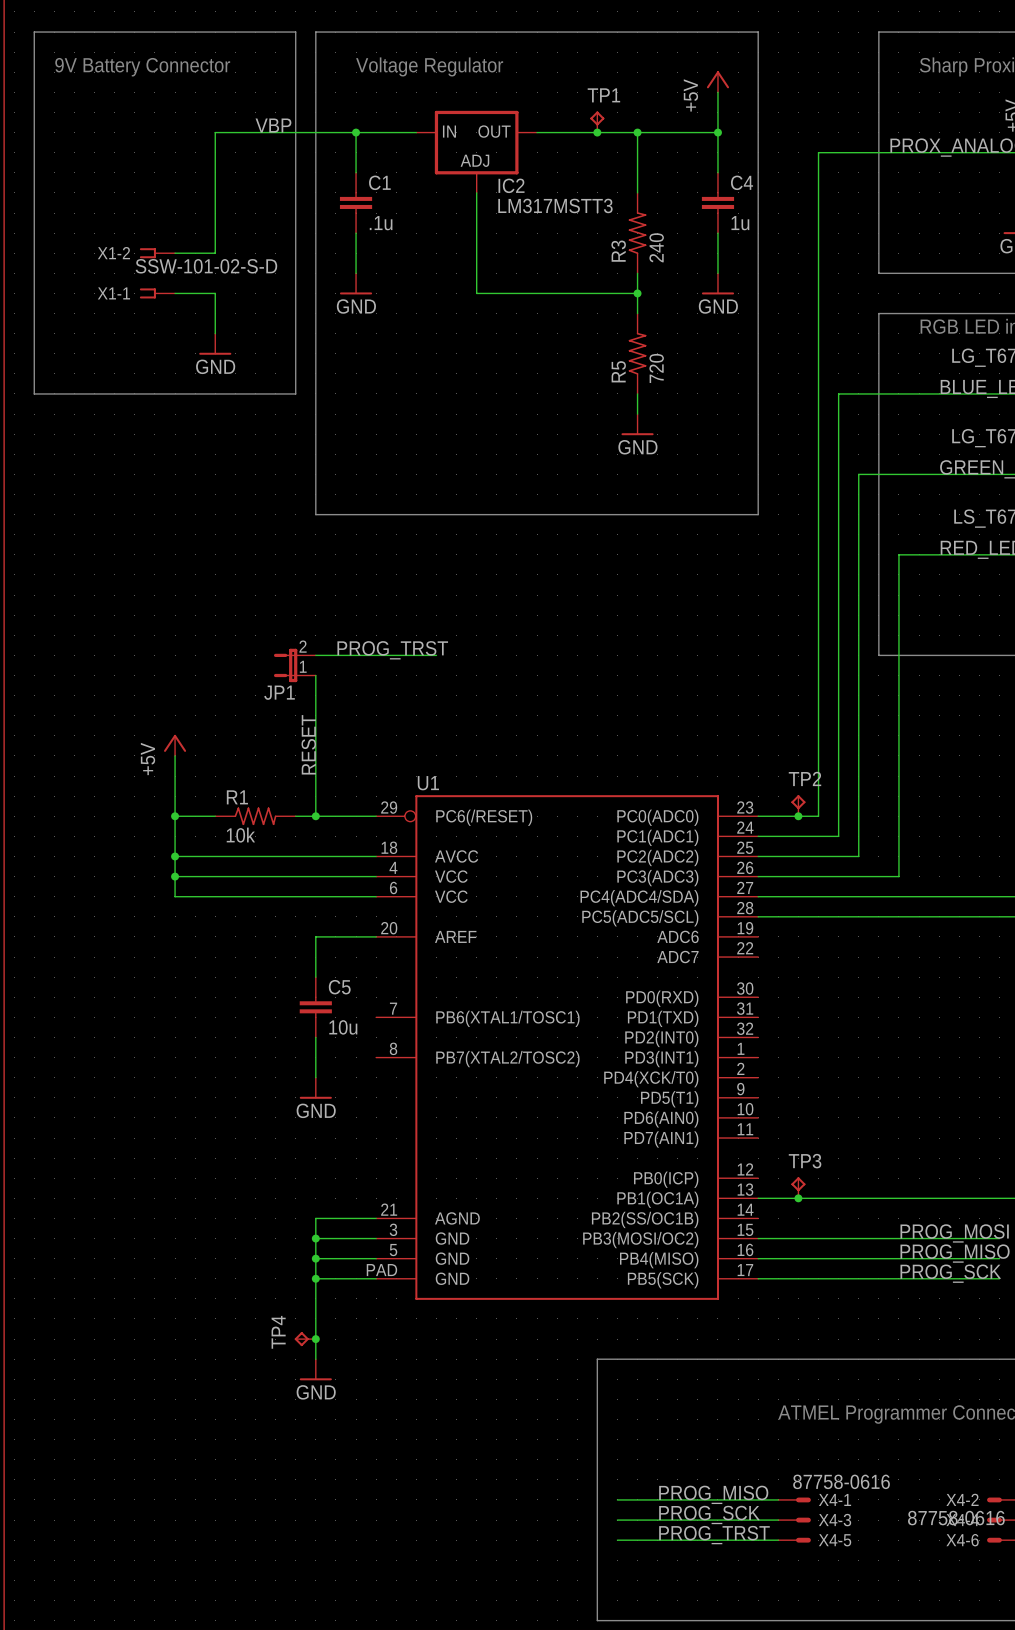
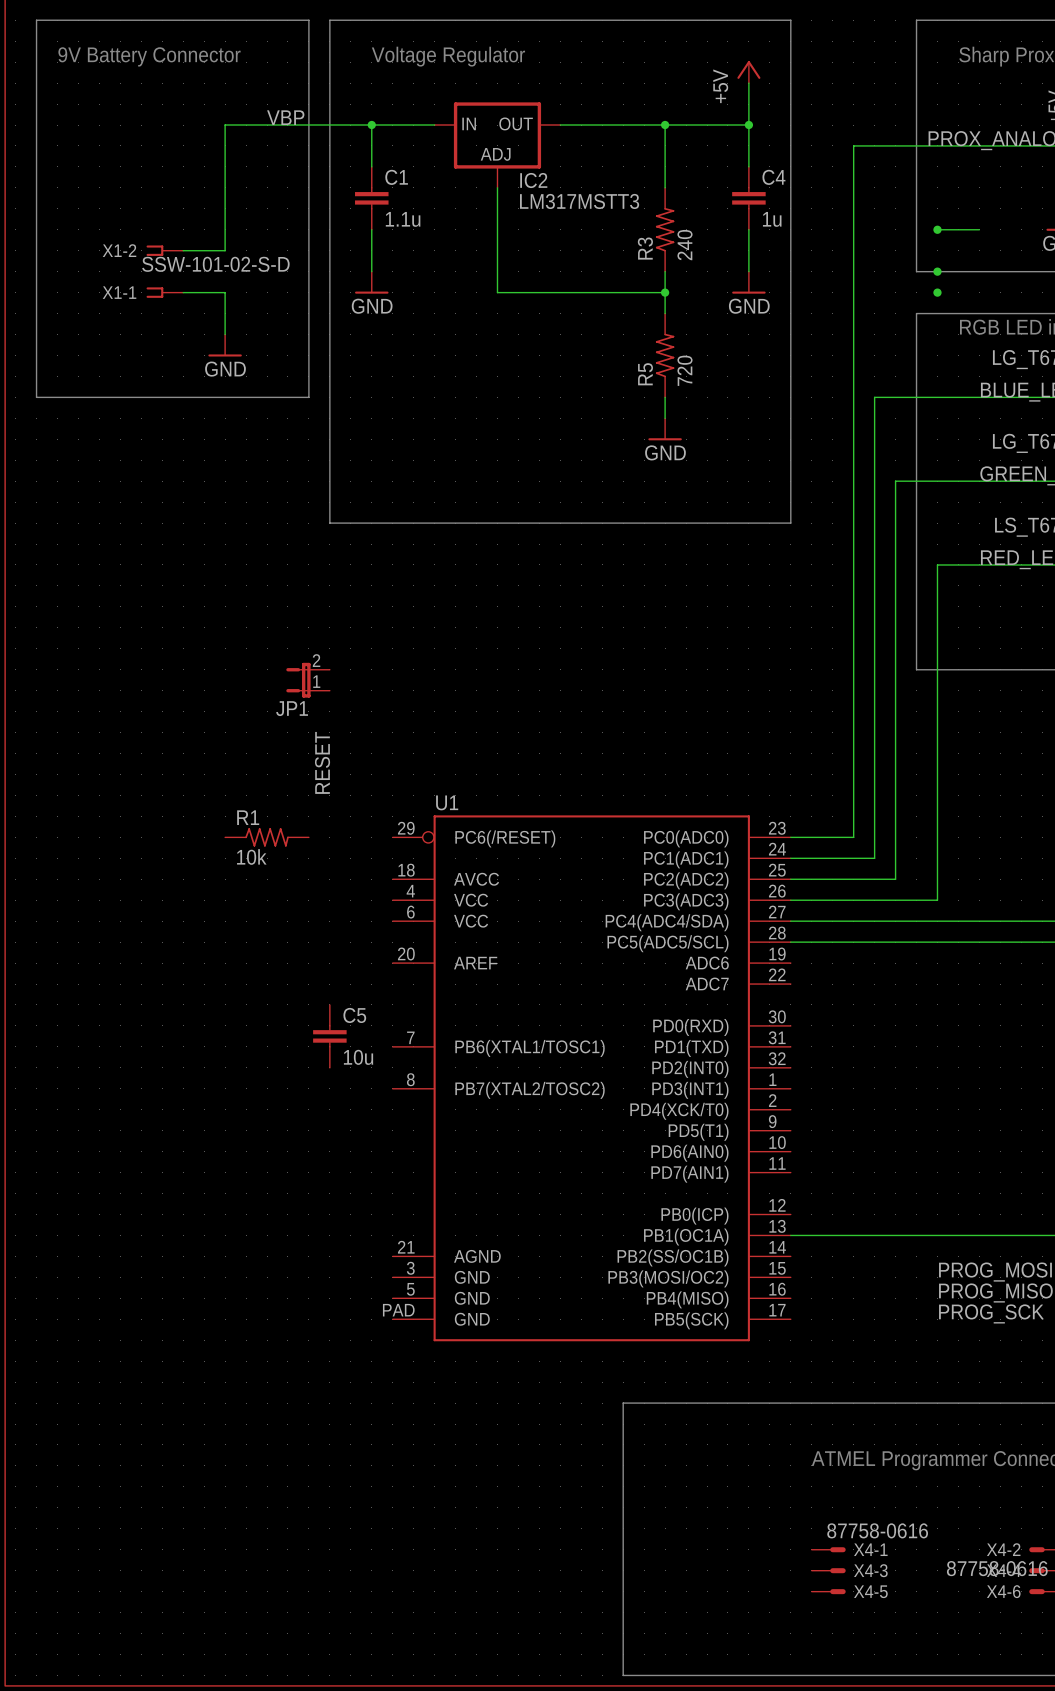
TP1: (597, 122) -> none
junction: (597, 132) -> none
C1 value: .1u (381, 223) -> 1.1u (403, 219)
wire: none -> (937, 229) (979, 229)
junction: none -> (937, 229)
junction: none -> (937, 271)
junction: none -> (937, 292)
label: PROG_TRST (392, 650) -> none
wire: (315, 655) (436, 655) -> none
wire: (315, 675) (315, 816) -> none
power symbol: +5V (175, 745) -> none
wire: (175, 755) (175, 896) (376, 896) -> none
TP2: (798, 805) -> none
wire: (175, 816) (215, 816) -> none
junction: (175, 816) -> none
wire: (295, 816) (376, 816) -> none
junction: (315, 816) -> none
junction: (798, 816) -> none
wire: (175, 856) (376, 856) -> none
junction: (175, 856) -> none
wire: (175, 876) (376, 876) -> none
junction: (175, 876) -> none
wire: (376, 936) (315, 936) (315, 977) -> none
wire: (315, 1037) (315, 1077) -> none
power symbol: GND (315, 1088) -> none
TP3: (798, 1187) -> none
junction: (798, 1198) -> none
wire: (376, 1218) (315, 1218) (315, 1359) -> none
wire: (315, 1238) (376, 1238) -> none
junction: (315, 1238) -> none
wire: (758, 1238) (999, 1238) -> none
wire: (315, 1258) (376, 1258) -> none
junction: (315, 1258) -> none
wire: (758, 1258) (999, 1258) -> none
wire: (315, 1278) (376, 1278) -> none
junction: (315, 1278) -> none
wire: (758, 1278) (999, 1278) -> none
TP4: (305, 1339) -> none
junction: (315, 1339) -> none
power symbol: GND (315, 1369) -> none
label: PROG_MISO (713, 1494) -> none
wire: (617, 1499) (778, 1499) -> none
label: PROG_SCK (709, 1514) -> none
wire: (617, 1520) (778, 1520) -> none
label: PROG_TRST (714, 1535) -> none
wire: (617, 1540) (778, 1540) -> none

